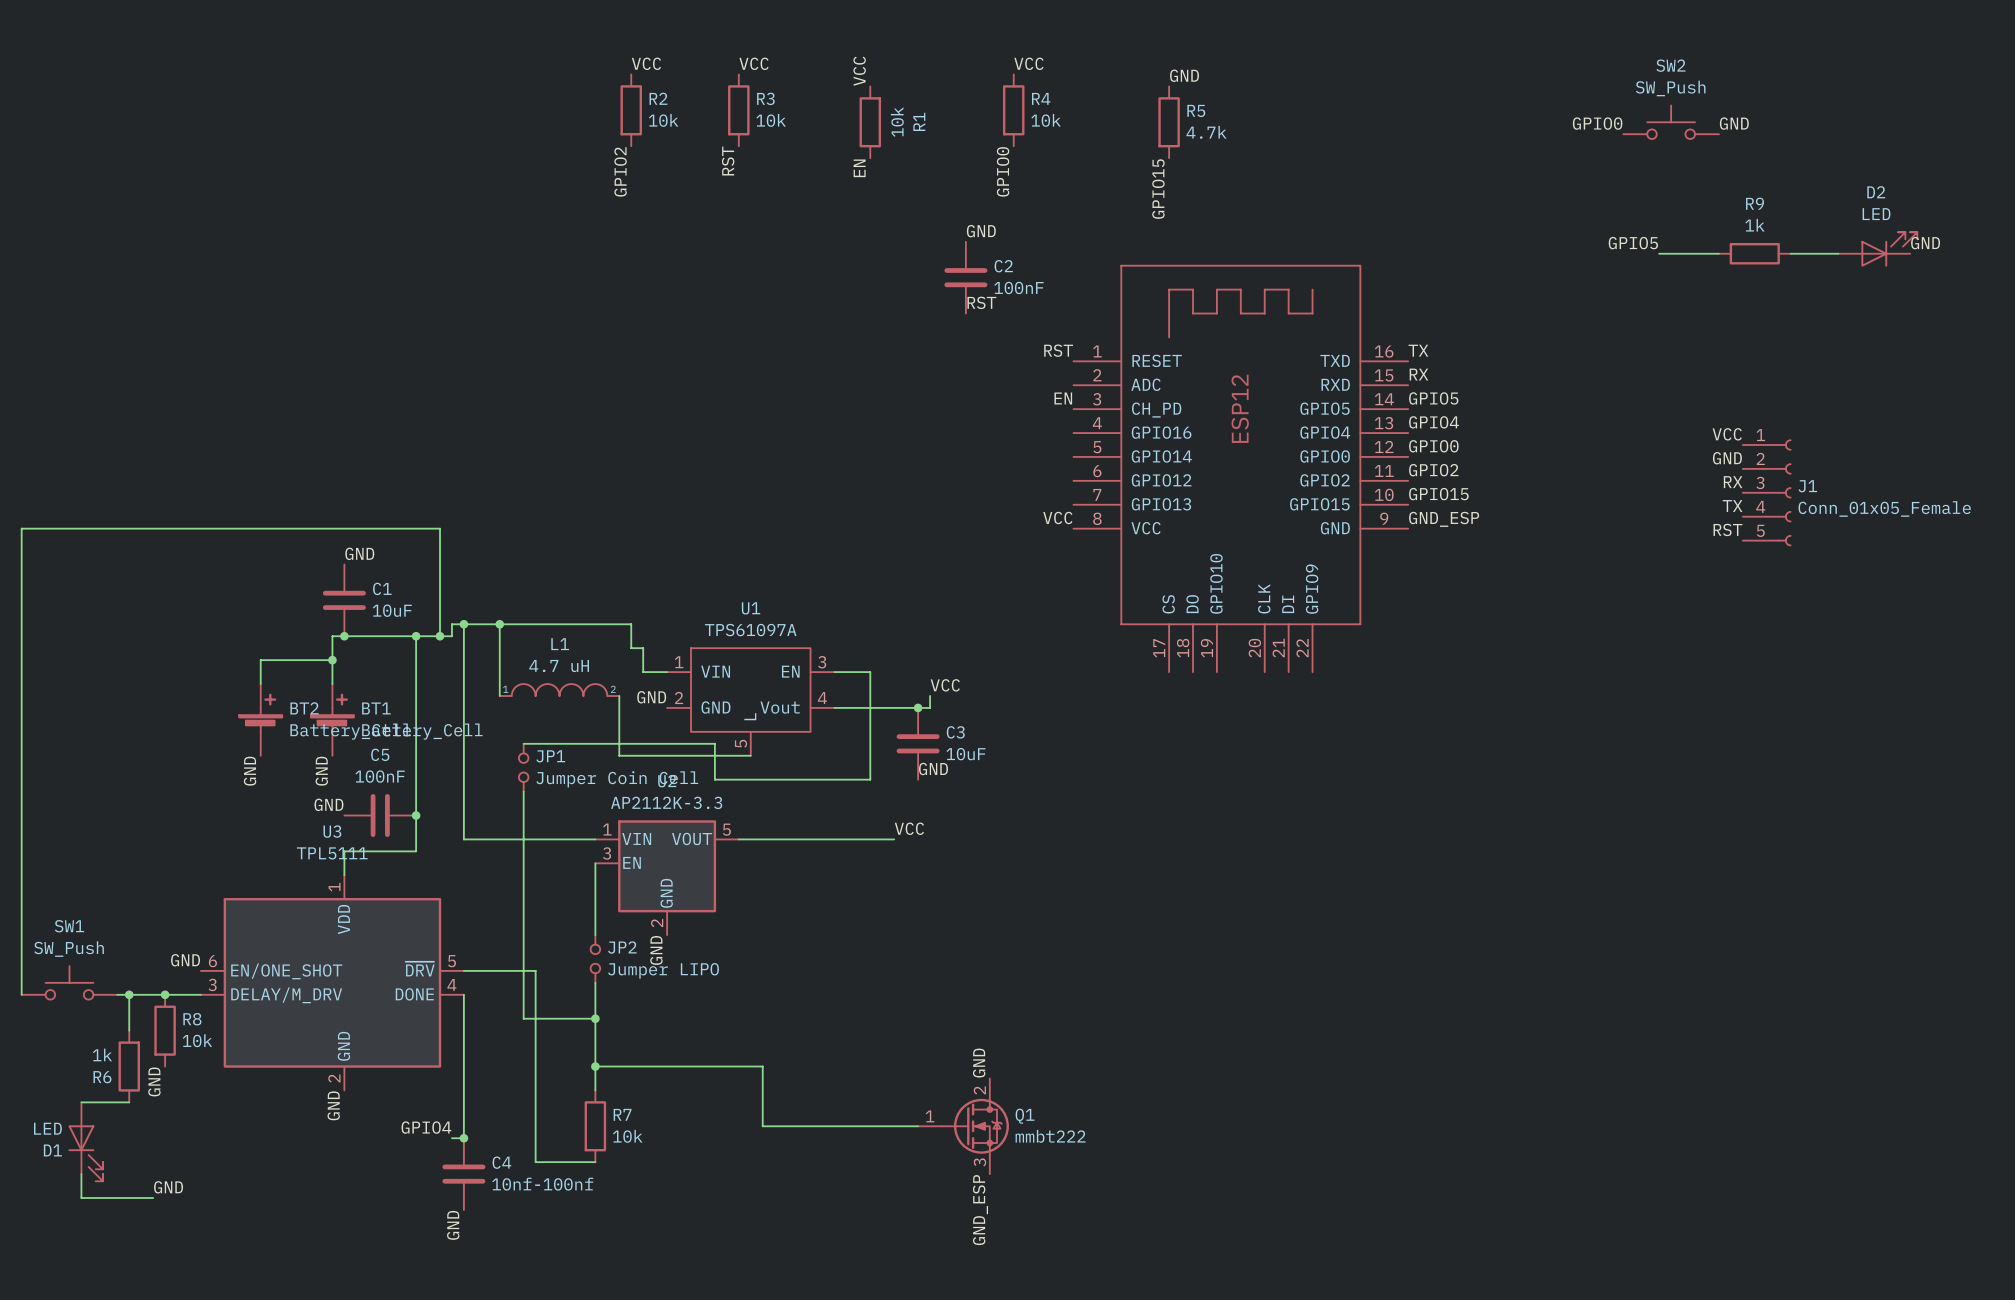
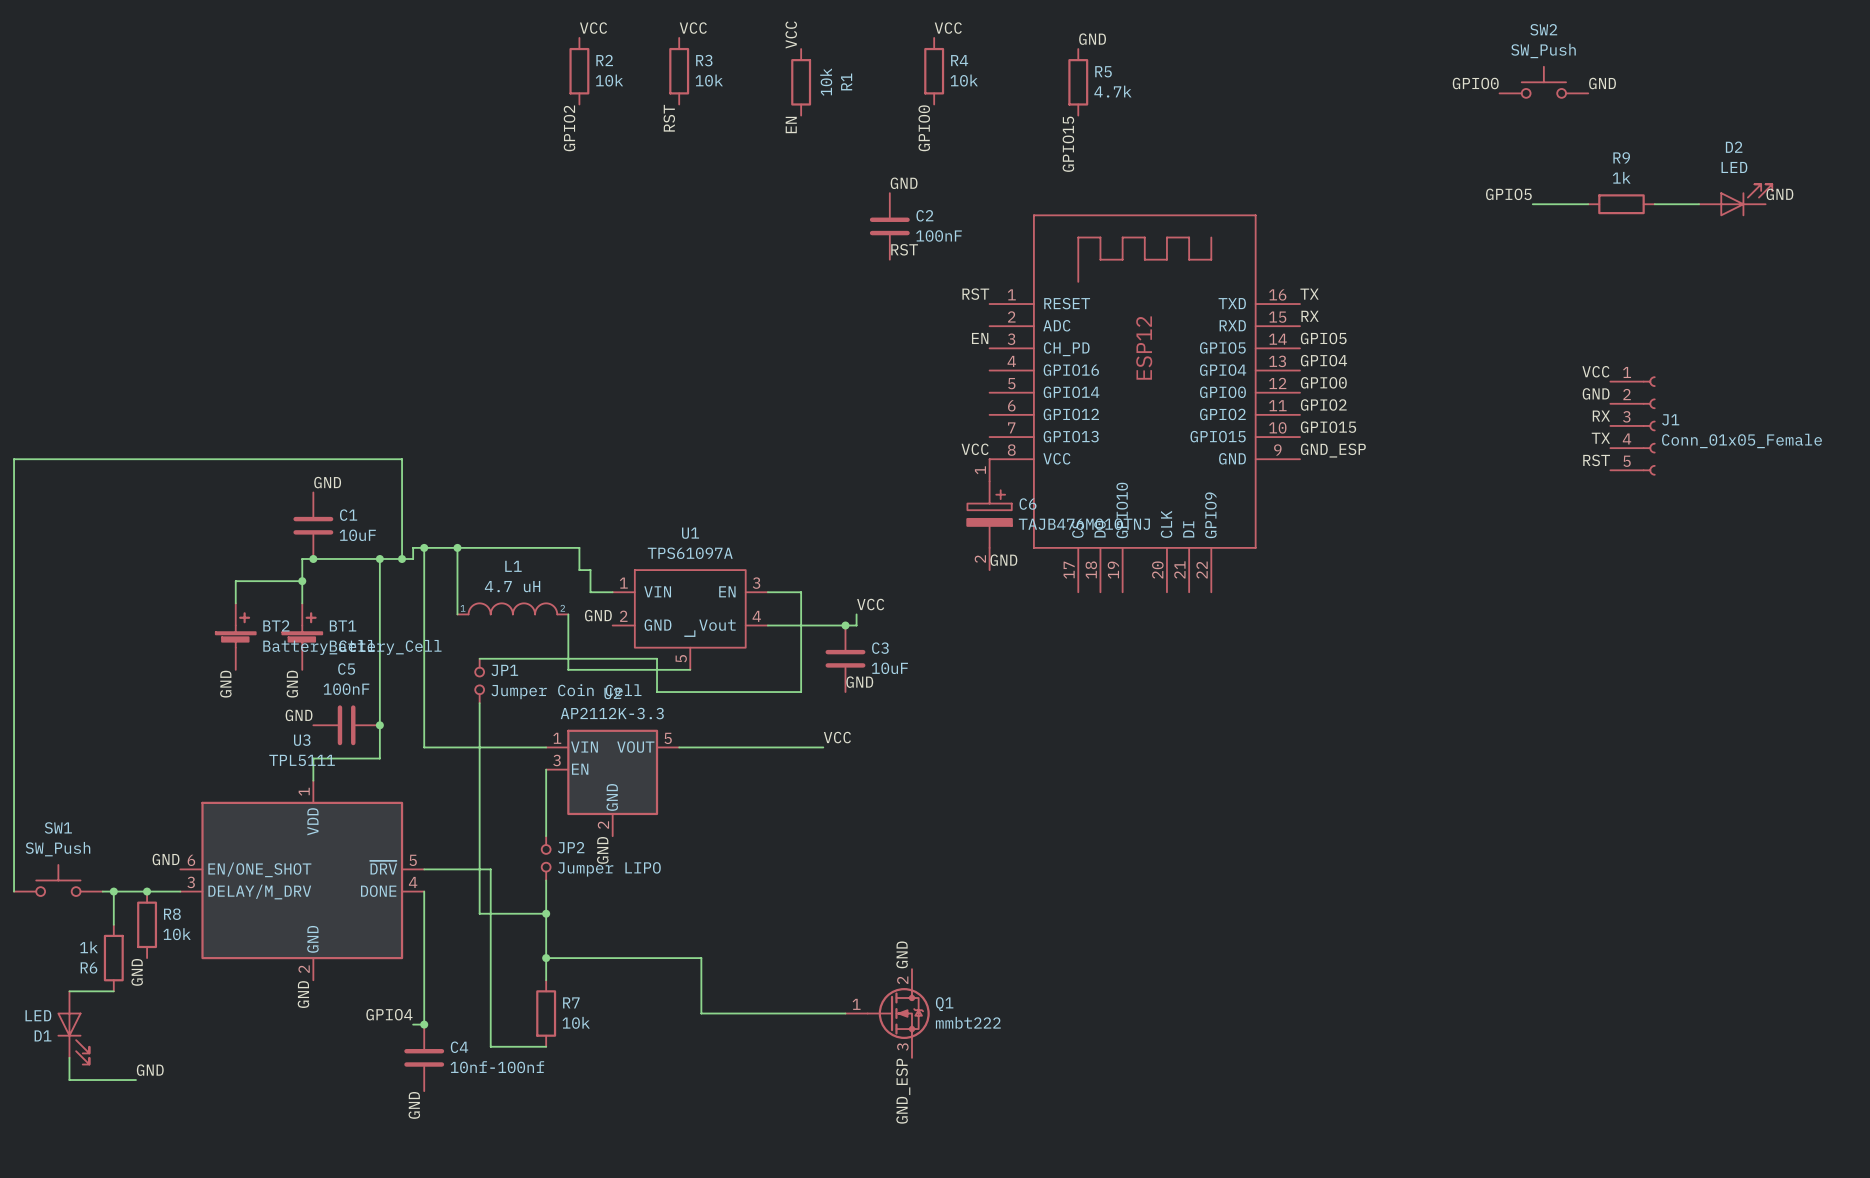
C6: none -> TAJB476M010TNJ (989, 514)
label: none -> GND (1003, 560)

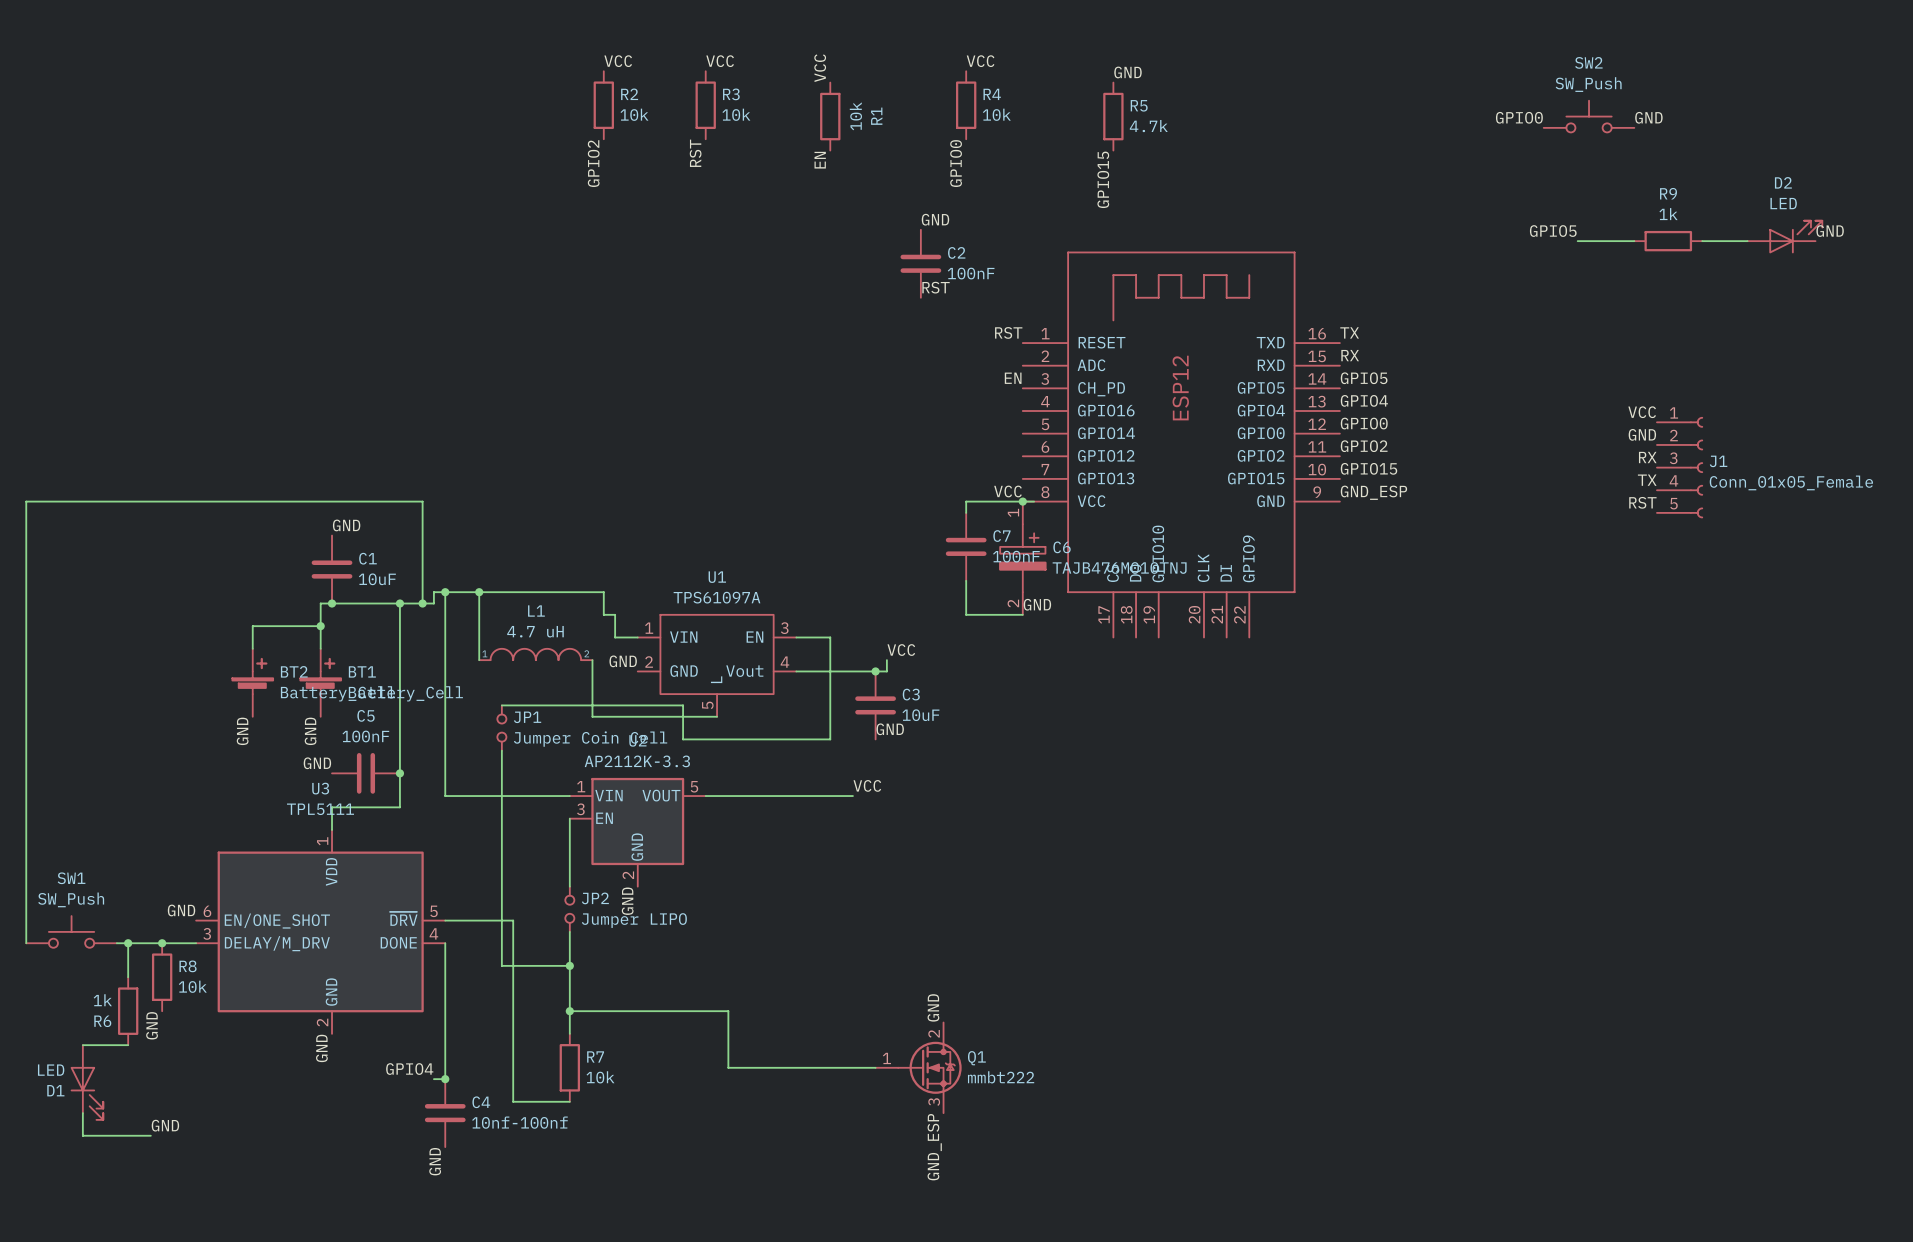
junction: none -> (1022, 501)
wire: none -> (1034, 501) (966, 501) (966, 512)
C7: none -> 100nF (966, 546)
wire: none -> (966, 580) (966, 614) (1022, 614)

